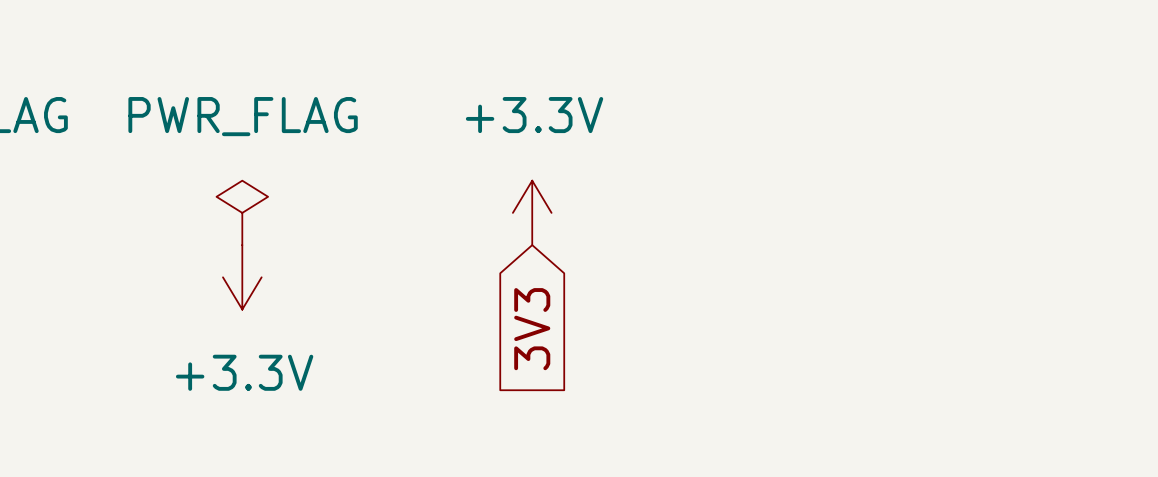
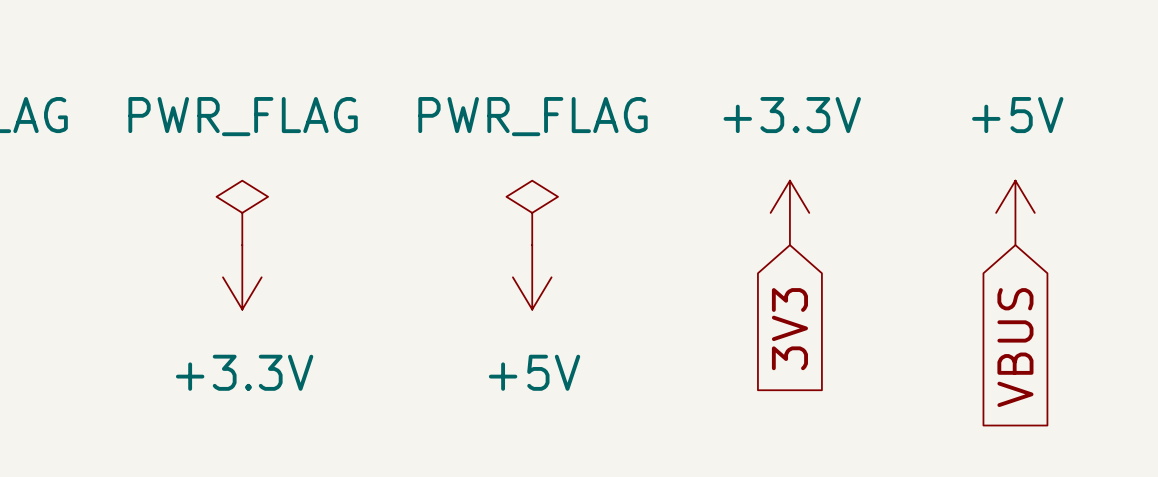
power symbol: +3.3V (532, 212) -> PWR_FLAG (532, 212)
power symbol: none -> +3.3V (789, 212)
power symbol: none -> +5V (1015, 212)
power symbol: none -> +5V (532, 277)
global label position: 3V3 (532, 329) -> 3V3 (789, 329)
global label: none -> VBUS (1015, 347)

